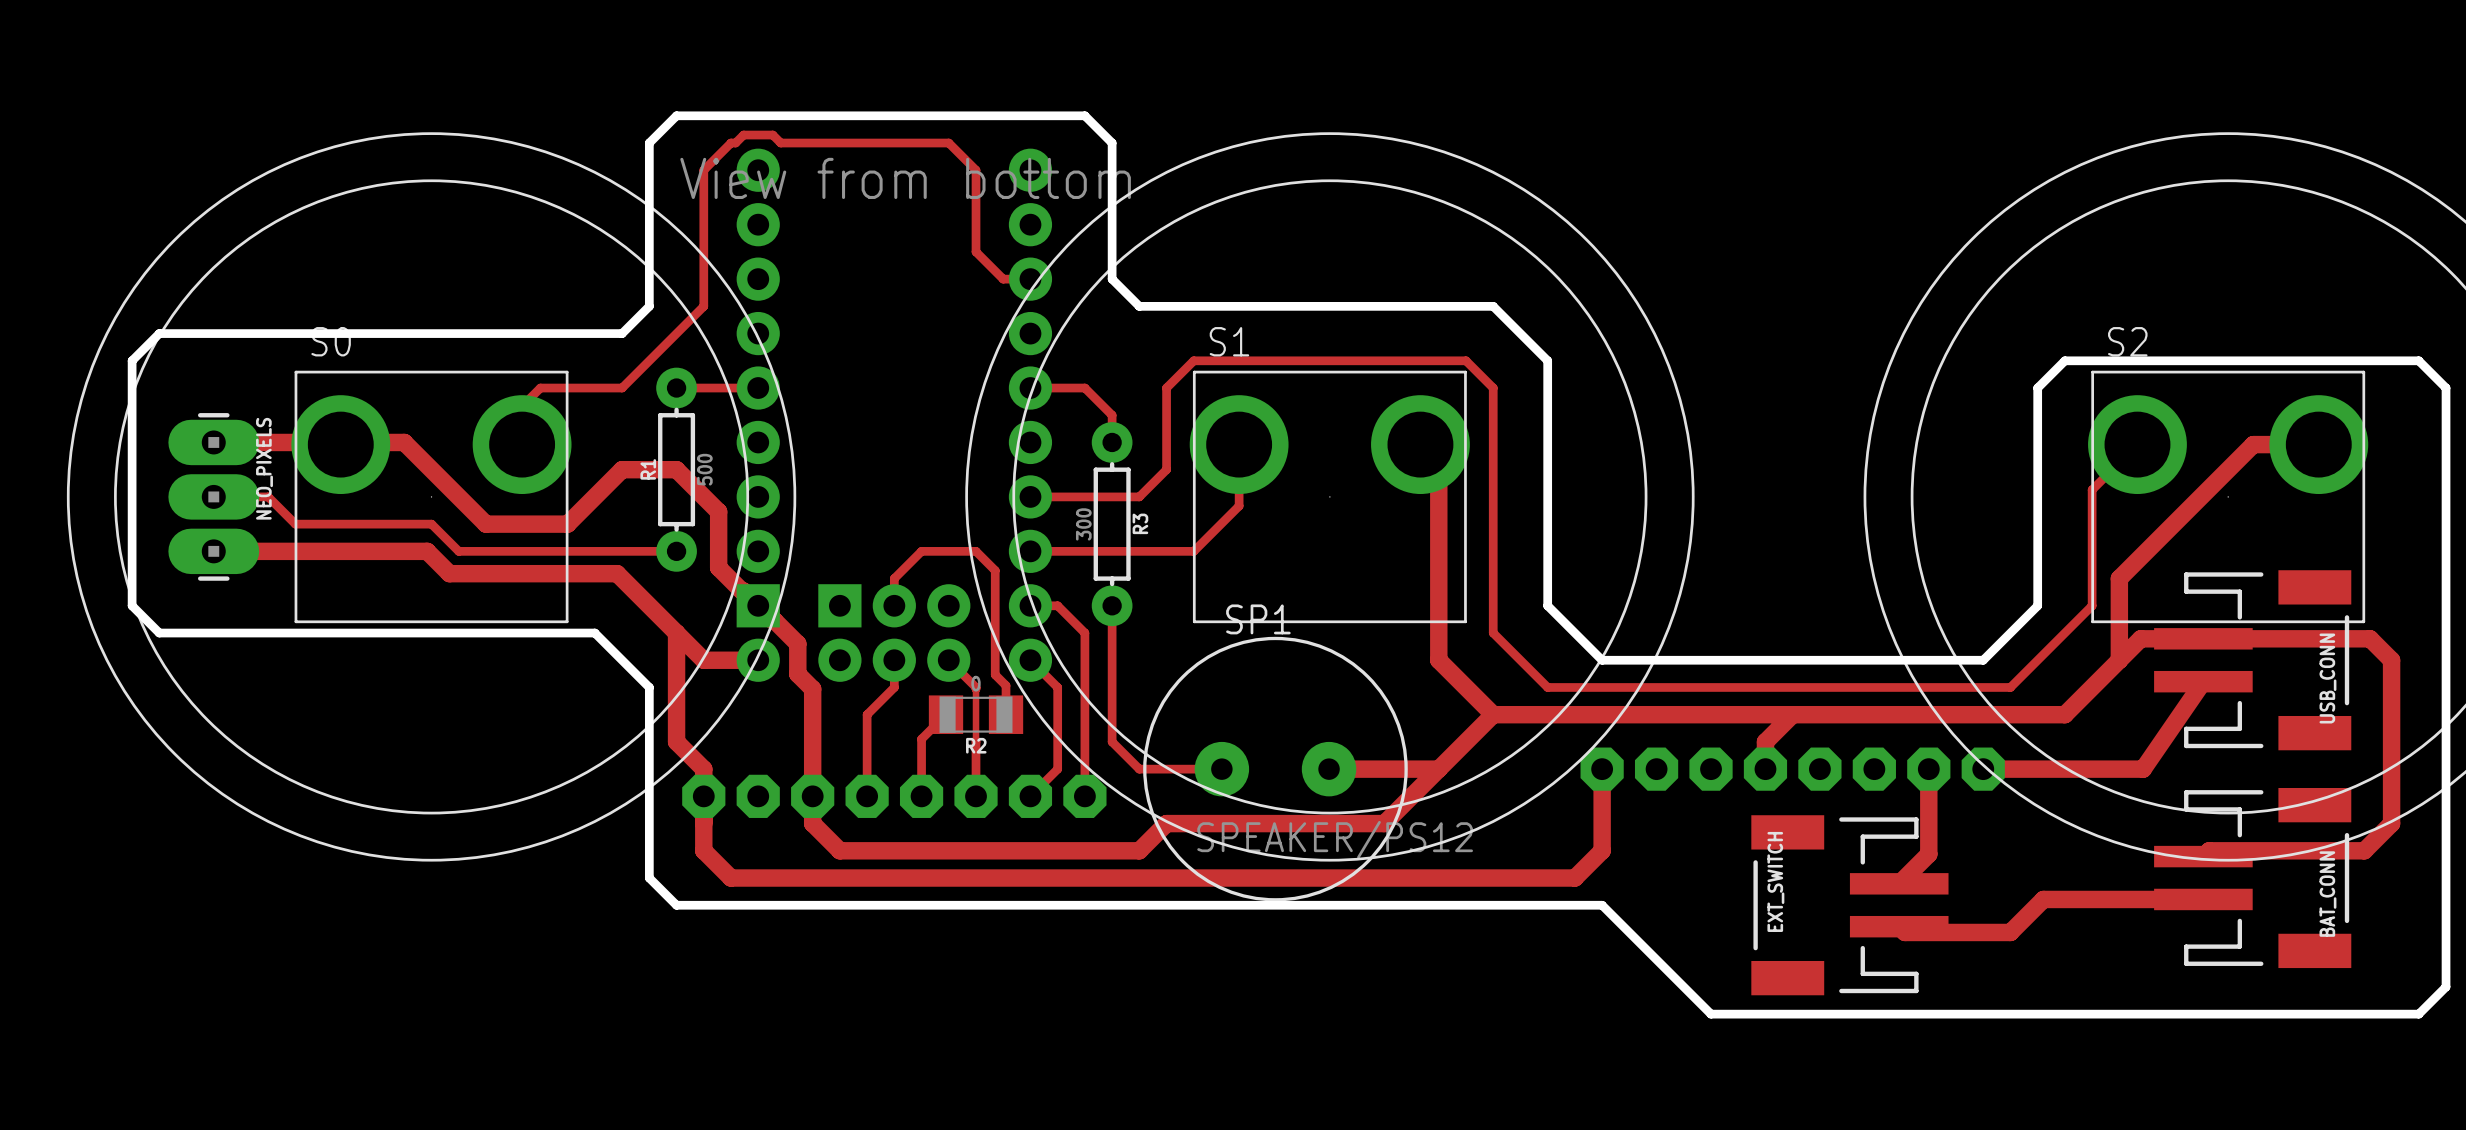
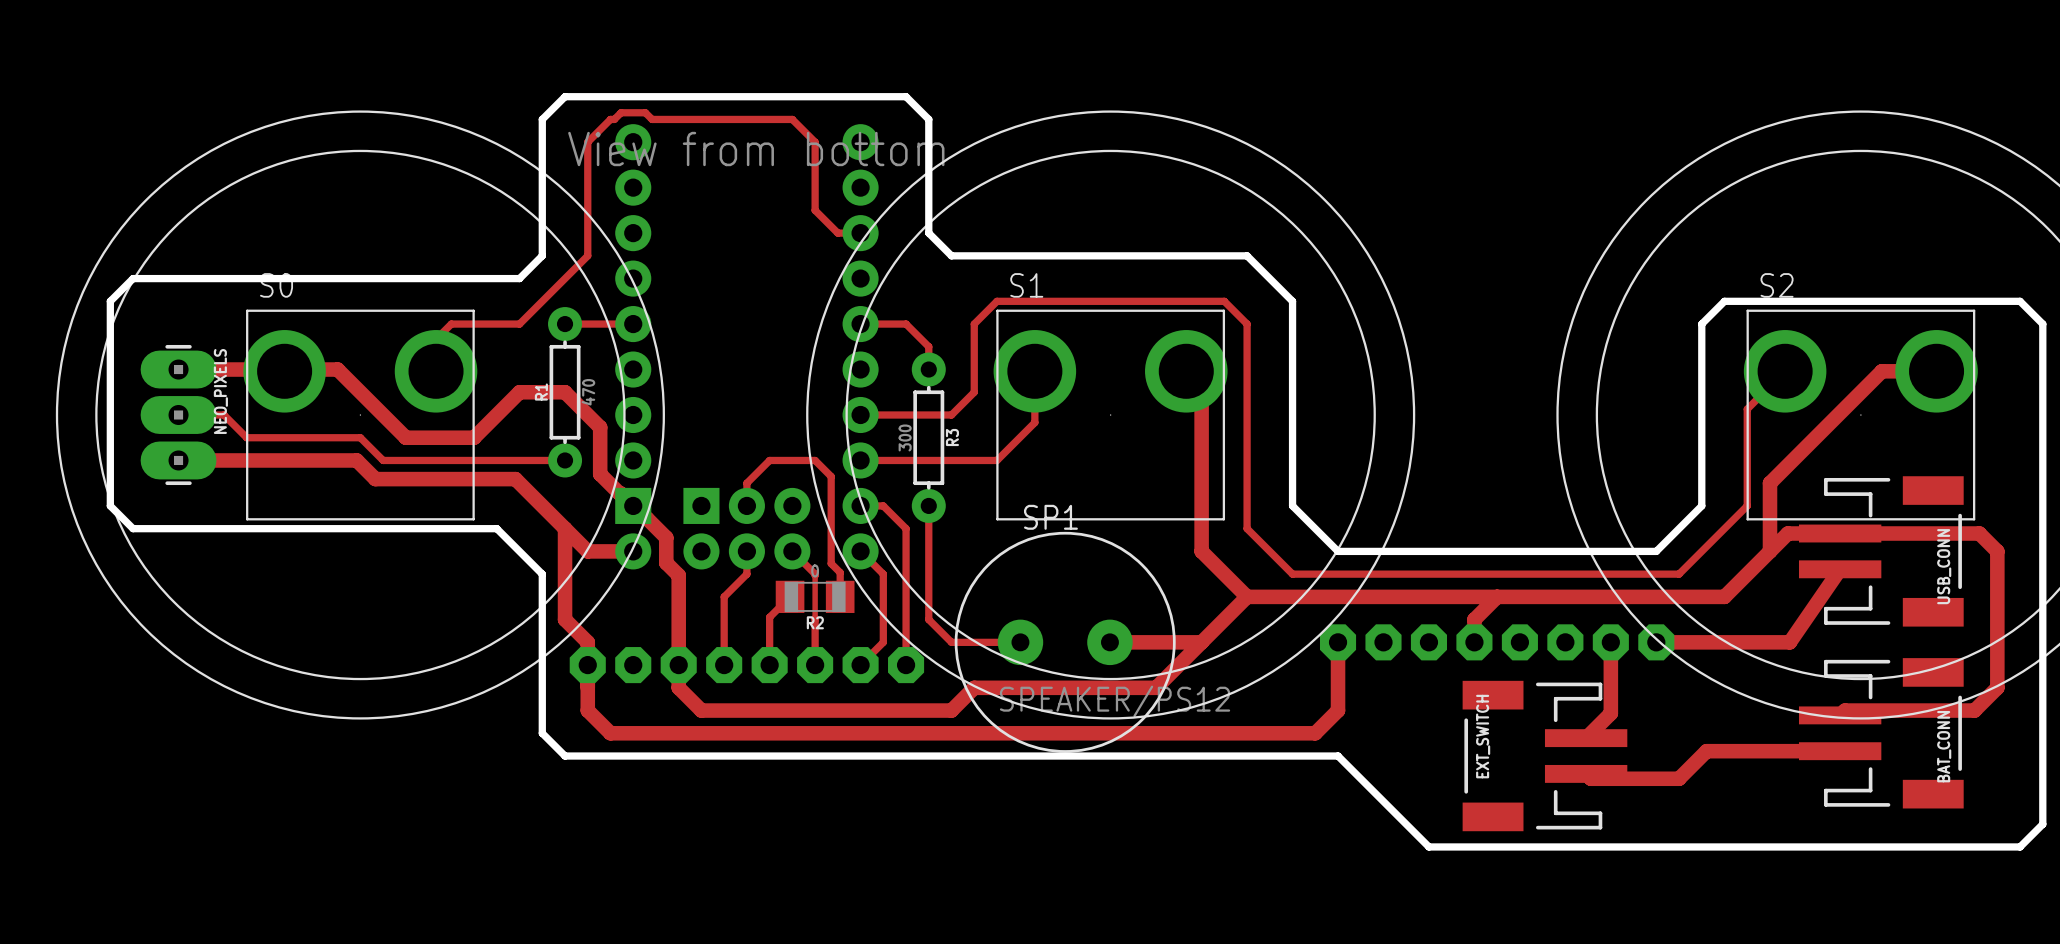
R1 value: 500 (704, 469) -> 470 (588, 392)

